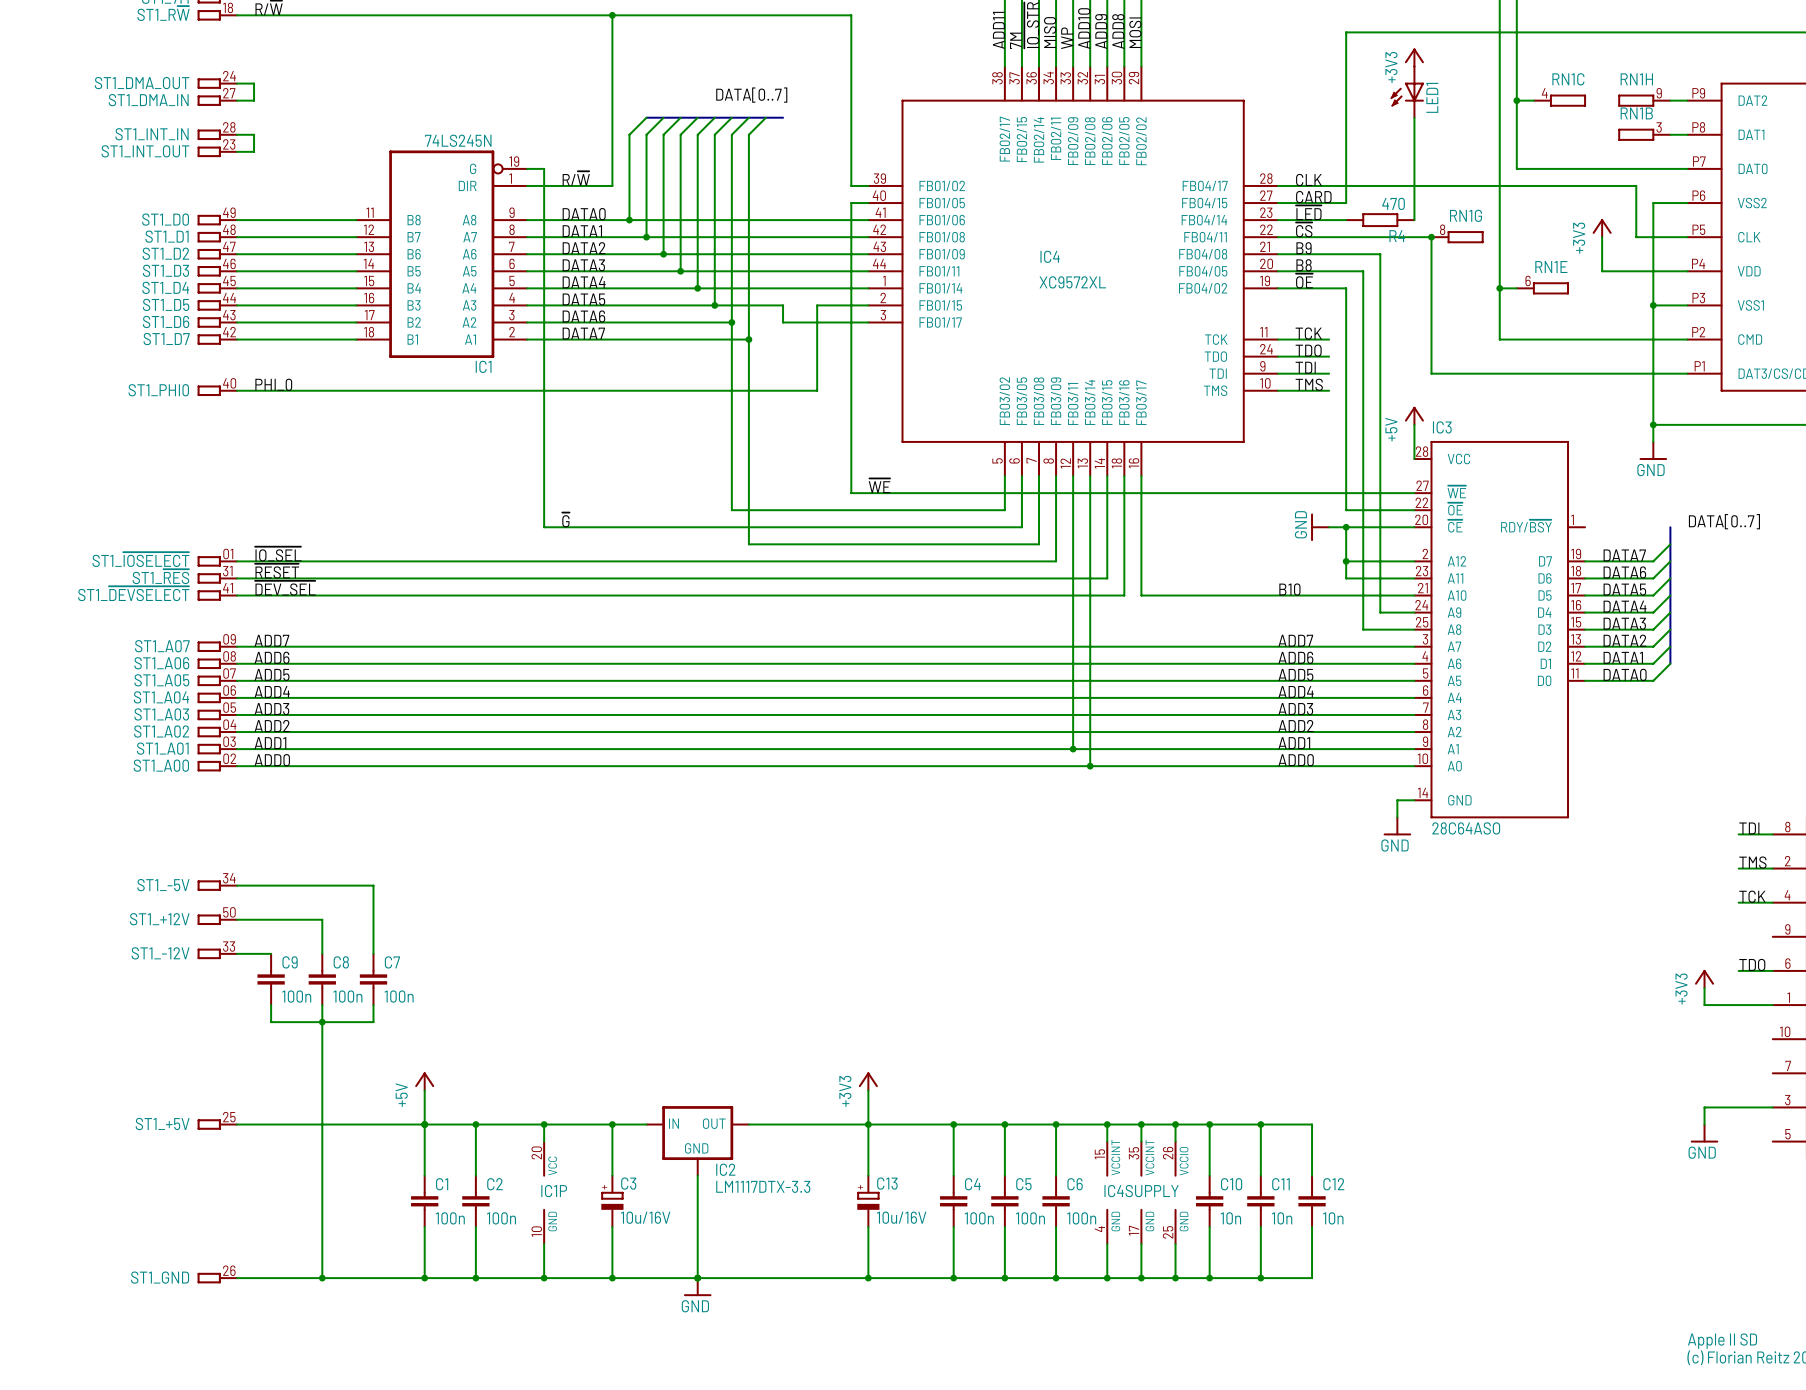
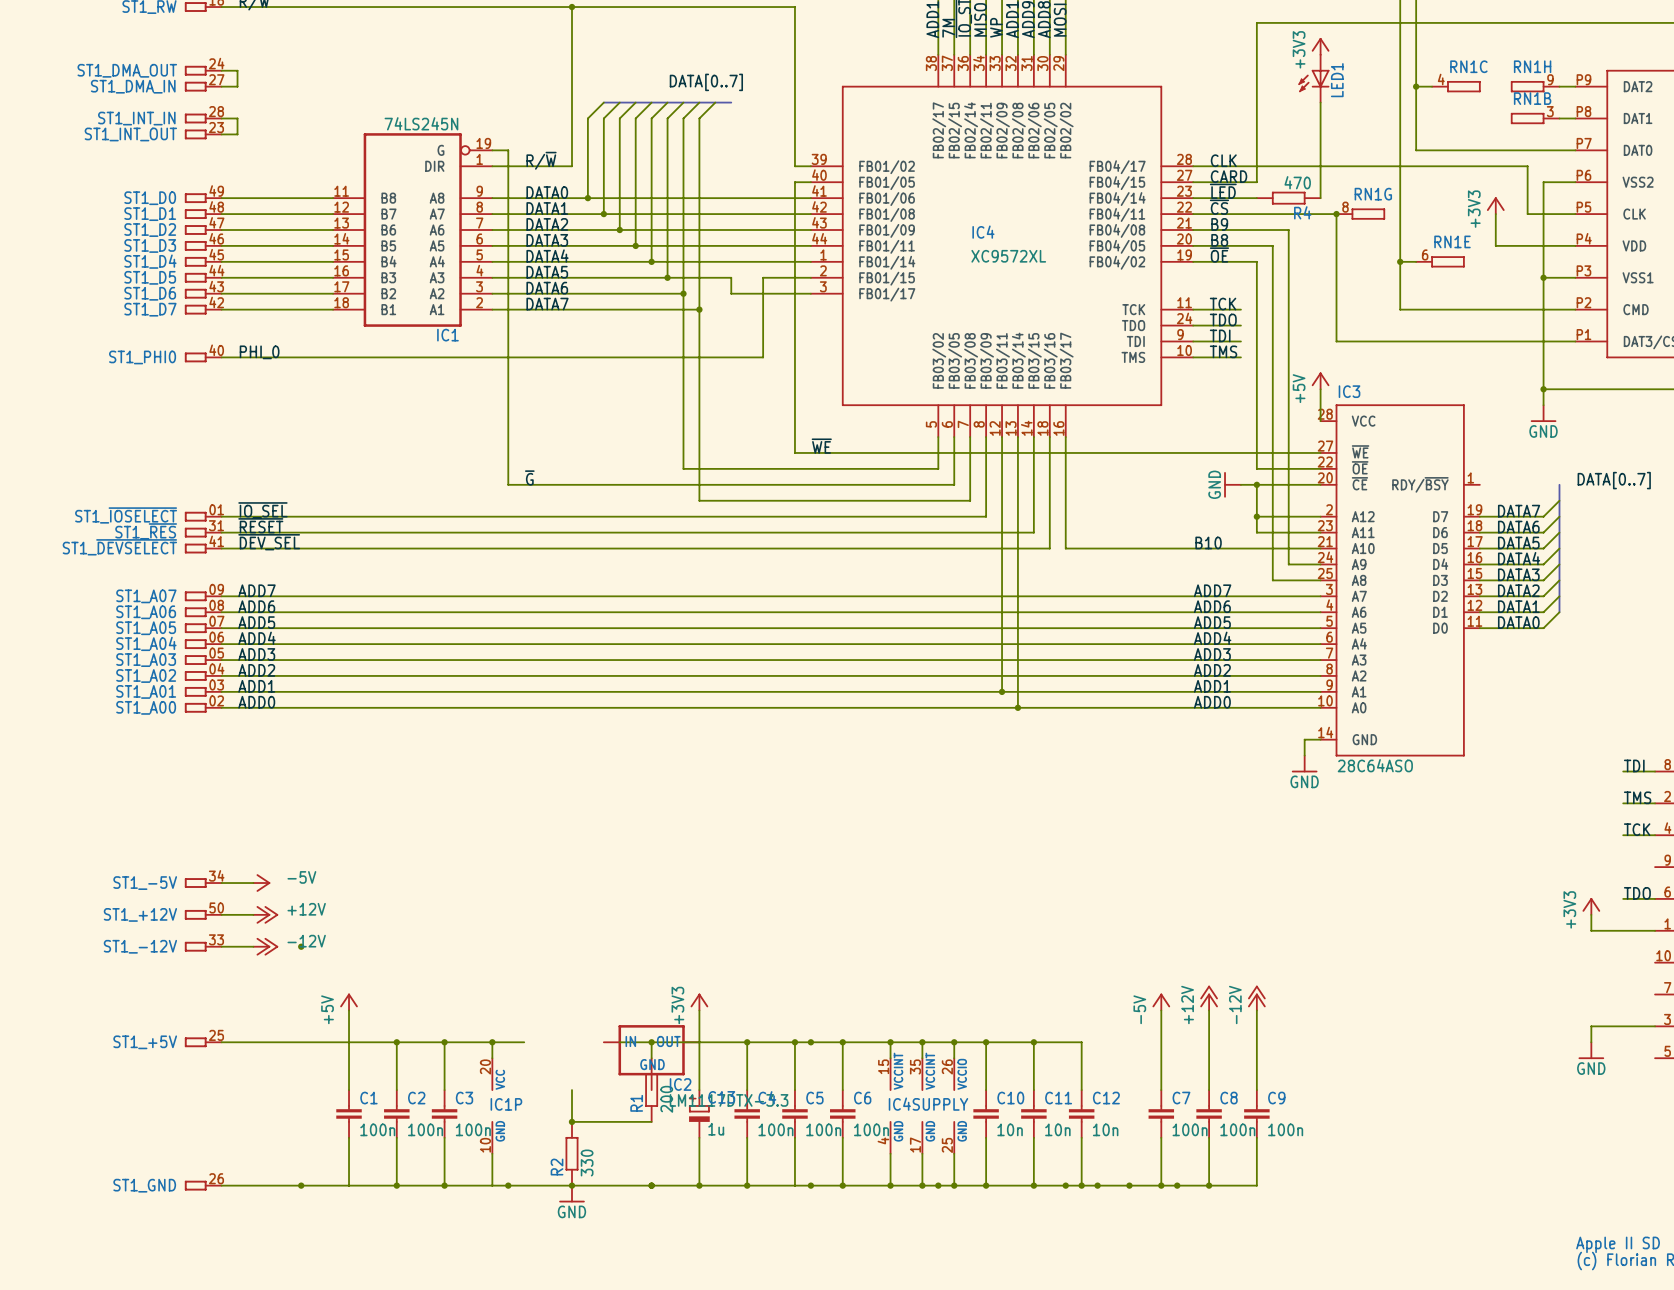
ST1_-5V position: (217, 885) -> (203, 883)
wire: (236, 885) (373, 885) (373, 953) -> none
ST1_+12V position: (217, 919) -> (203, 914)
wire: (236, 919) (322, 919) (322, 953) -> none
ST1_-12V position: (217, 953) -> (203, 946)
power symbol: none -> -5V (261, 883)
C9 position: (271, 979) -> (1256, 1113)
C8 position: (322, 979) -> (1209, 1113)
C7 position: (373, 979) -> (1161, 1113)
wire: none -> (221, 914) (253, 914)
power symbol: none -> +12V (265, 914)
wire: (271, 1005) (271, 1022) (373, 1022) (373, 1005) -> none
wire: (322, 1005) (322, 1278) -> none
wire: none -> (221, 946) (253, 946)
power symbol: none -> -12V (265, 946)
power symbol: none -> +12V (1209, 998)
power symbol: none -> -12V (1256, 998)
power symbol position: +5V (424, 1081) -> +5V (349, 1002)
power symbol position: +3V3 (868, 1081) -> +3V3 (699, 1002)
power symbol: none -> -5V (1161, 1002)
wire: none -> (349, 1010) (349, 1090)
wire: (424, 1090) (424, 1124) -> none
wire: (868, 1090) (868, 1175) -> (699, 1010) (699, 1090)
wire: none -> (1161, 1010) (1161, 1090)
wire: none -> (1209, 1010) (1209, 1090)
wire: none -> (1256, 1010) (1256, 1090)
wire: (544, 1124) (544, 1141) -> (492, 1042) (492, 1058)
junction position: (544, 1124) -> (492, 1042)
wire: (561, 1124) (646, 1124) -> (619, 1042) (699, 1042)
wire: (612, 1124) (612, 1175) -> (651, 1121) (571, 1121) (571, 1090)
junction: (612, 1124) -> none
wire: none -> (651, 1042) (651, 1058)
junction: none -> (651, 1042)
wire: none -> (747, 1042) (747, 1090)
junction: none -> (747, 1042)
junction: none -> (794, 1042)
wire: none -> (842, 1042) (842, 1090)
junction: none -> (842, 1042)
junction: none -> (922, 1042)
wire: (1004, 1124) (1004, 1175) -> (794, 1042) (794, 1090)
junction: (1004, 1124) -> none
junction: none -> (954, 1042)
wire: (1141, 1124) (1141, 1141) -> (922, 1042) (922, 1058)
junction: (1141, 1124) -> none
wire: (1158, 1124) (1312, 1124) (1312, 1175) -> (1081, 1042) (1081, 1090)
wire: (1175, 1124) (1175, 1141) -> (954, 1042) (954, 1058)
junction: (1175, 1124) -> none
wire: (1209, 1124) (1209, 1175) -> none
junction: (1209, 1124) -> none
wire: (1260, 1124) (1260, 1175) -> (1209, 1137) (1209, 1185)
junction: (1260, 1124) -> none
wire: (697, 1175) (697, 1278) -> none
R1: none -> 200 (651, 1090)
C1 name: C1 (442, 1184) -> C2 (416, 1098)
C2 name: C2 (495, 1184) -> C3 (464, 1098)
C6 name: C6 (1075, 1184) -> C10 (1010, 1098)
IC1P position: (544, 1192) -> (492, 1105)
IC4SUPPLY position: (1141, 1192) -> (922, 1105)
C1: none -> 100n (349, 1113)
C3: 10u/16V (612, 1201) -> none
C13 position: (868, 1201) -> (699, 1113)
C6: none -> 100n (842, 1113)
C4 position: (953, 1201) -> (747, 1113)
C5 position: (1004, 1201) -> (794, 1113)
C10: 10n (1209, 1201) -> none
C11 position: (1260, 1201) -> (1033, 1113)
C12 position: (1312, 1201) -> (1081, 1113)
junction: none -> (571, 1121)
C13 value: 10u/16V (901, 1217) -> 1u (716, 1129)
C6 value: 100n (1081, 1218) -> 10n (1010, 1129)
wire: none -> (349, 1137) (349, 1185)
wire: (612, 1226) (612, 1278) -> none
wire: none -> (747, 1137) (747, 1185)
wire: (868, 1226) (868, 1278) -> (699, 1137) (699, 1185)
wire: none -> (842, 1137) (842, 1185)
wire: (1004, 1226) (1004, 1278) -> (794, 1137) (794, 1185)
wire: (1209, 1226) (1209, 1278) -> (1081, 1137) (1081, 1185)
wire: (1260, 1226) (1260, 1278) -> (1161, 1137) (1161, 1185)
wire: (1312, 1226) (1312, 1278) -> (1256, 1137) (1256, 1185) (1225, 1185)
wire: (544, 1243) (544, 1278) -> (492, 1153) (492, 1185)
R2: none -> 330 (571, 1153)
wire: (1141, 1243) (1141, 1278) -> (922, 1153) (922, 1185)
wire: (1175, 1243) (1175, 1278) -> (954, 1153) (954, 1185)
junction: none -> (699, 1185)
junction: none -> (747, 1185)
junction: none -> (842, 1185)
junction: none -> (922, 1185)
junction: none -> (954, 1185)
junction: none -> (1081, 1185)
junction: none -> (1161, 1185)
junction: none -> (1209, 1185)
power symbol position: GND (697, 1287) -> GND (571, 1193)

